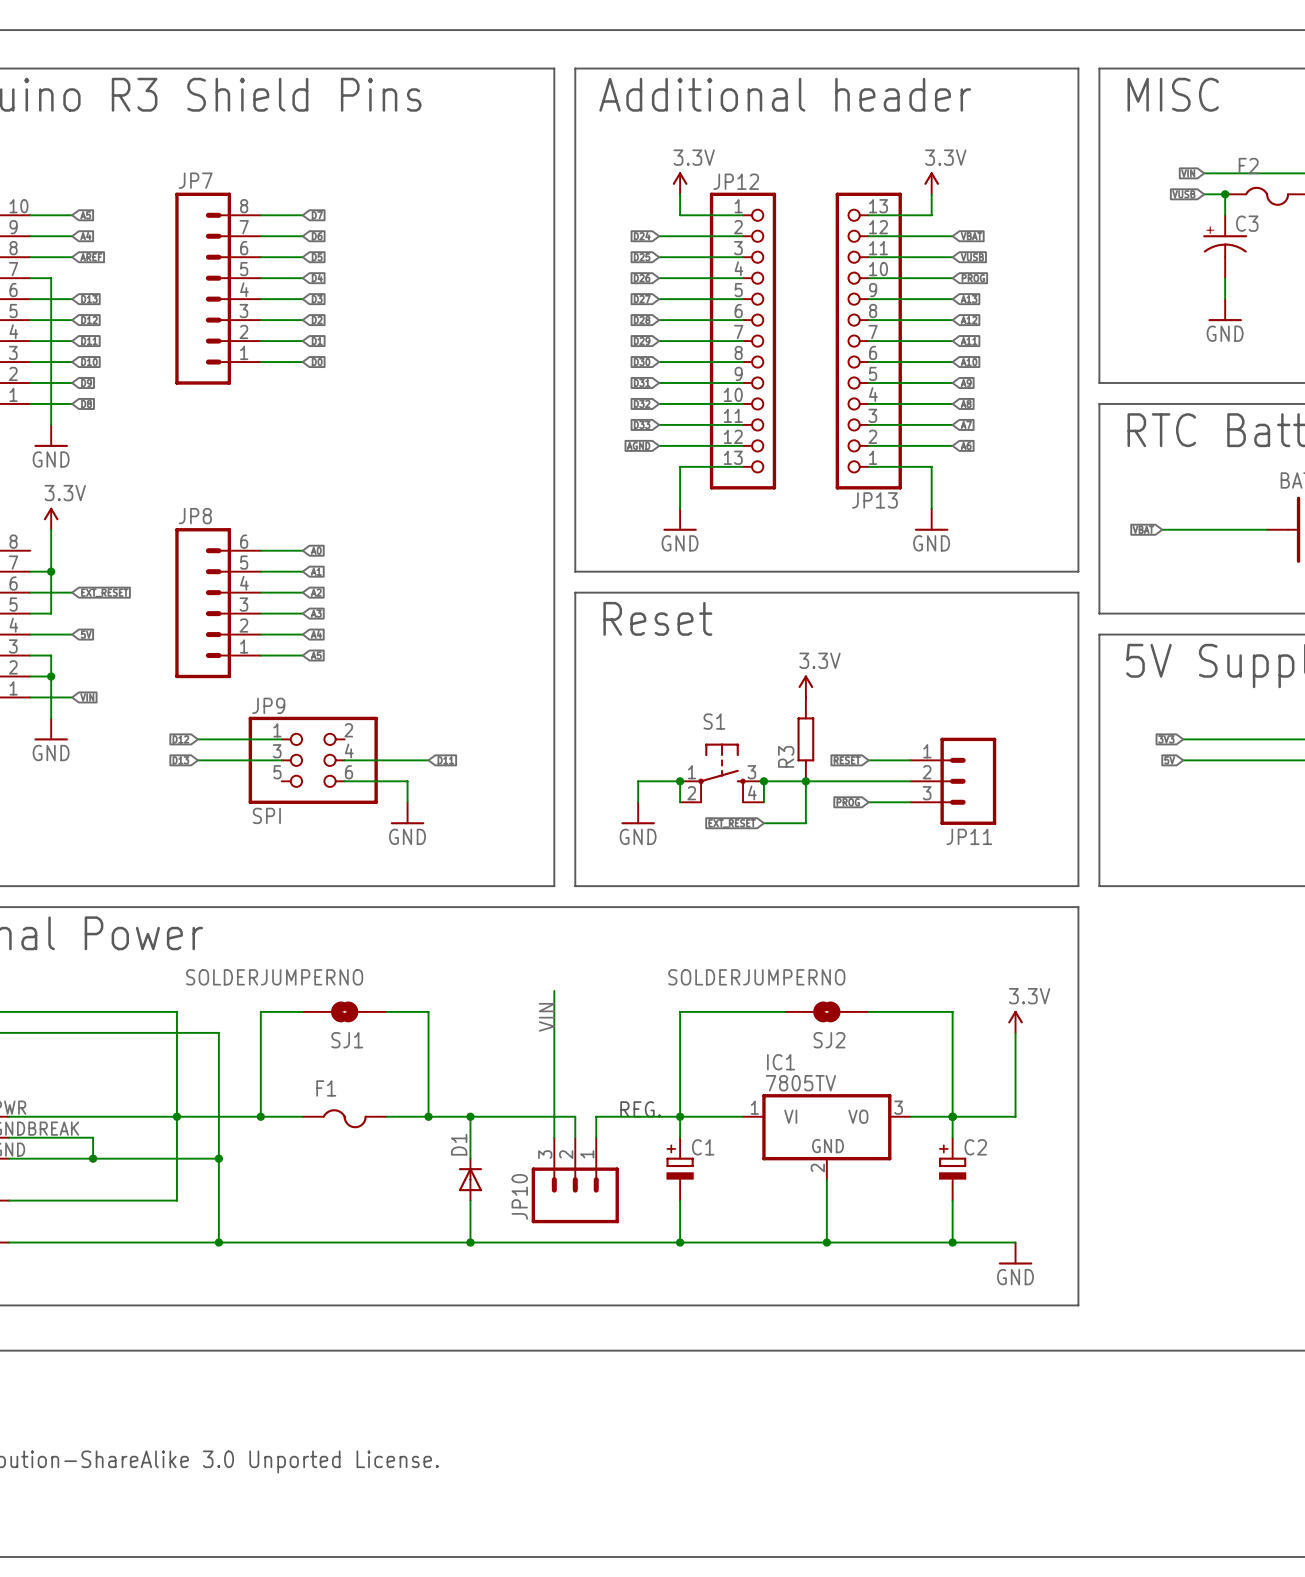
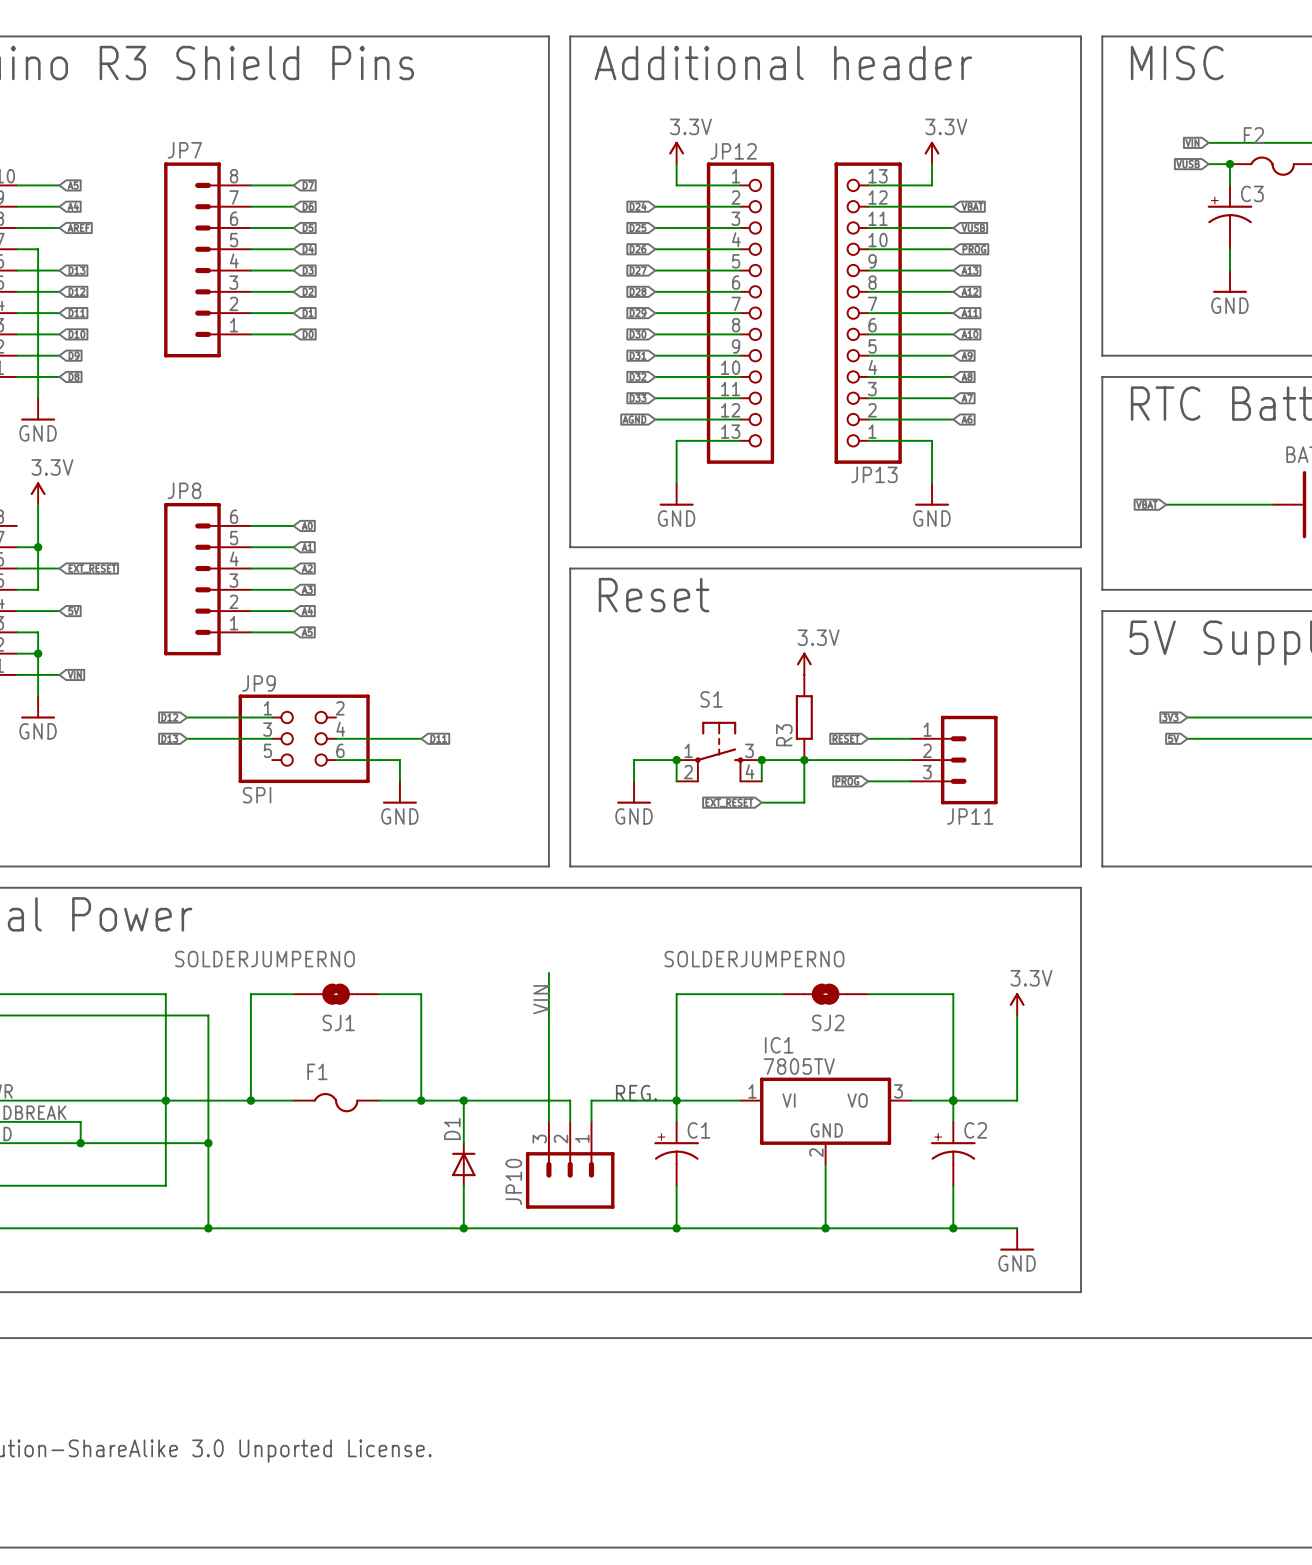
C1 symbol: [666, 1137, 694, 1201] -> [654, 1121, 699, 1186]
C2 symbol: [939, 1137, 967, 1201] -> [930, 1121, 976, 1186]

